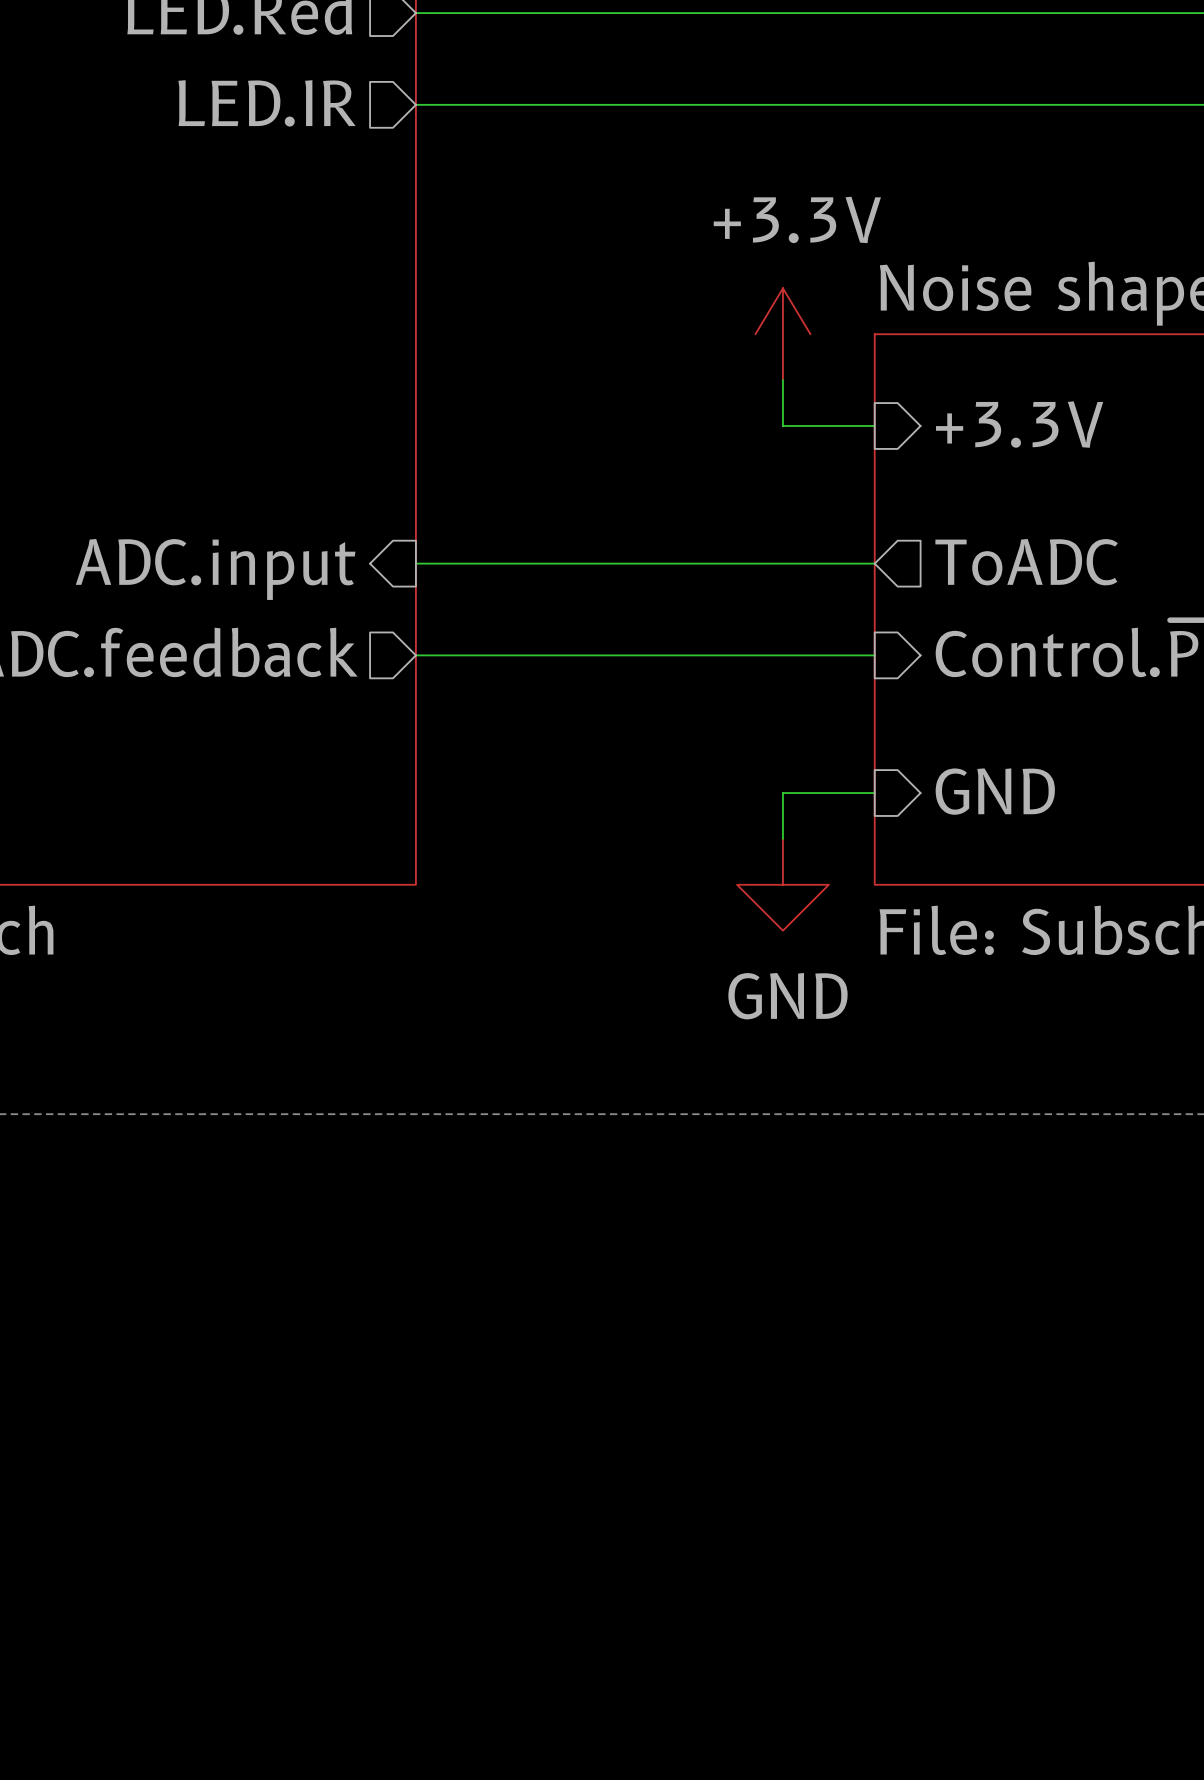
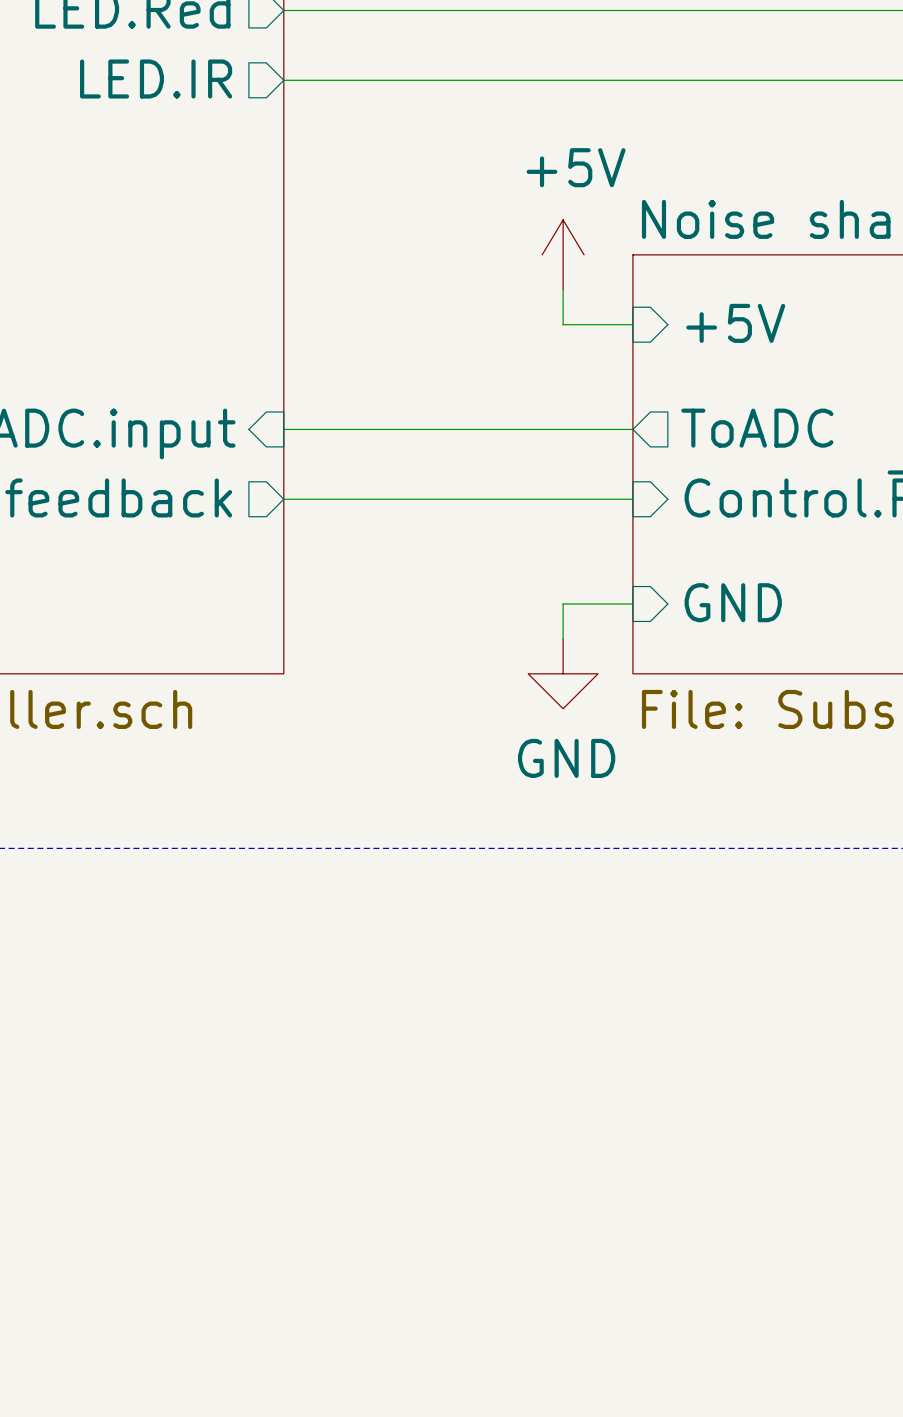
power symbol: +3.3V (782, 334) -> +5V (563, 254)
sheet pin: +3.3V (1019, 424) -> +5V (735, 323)

